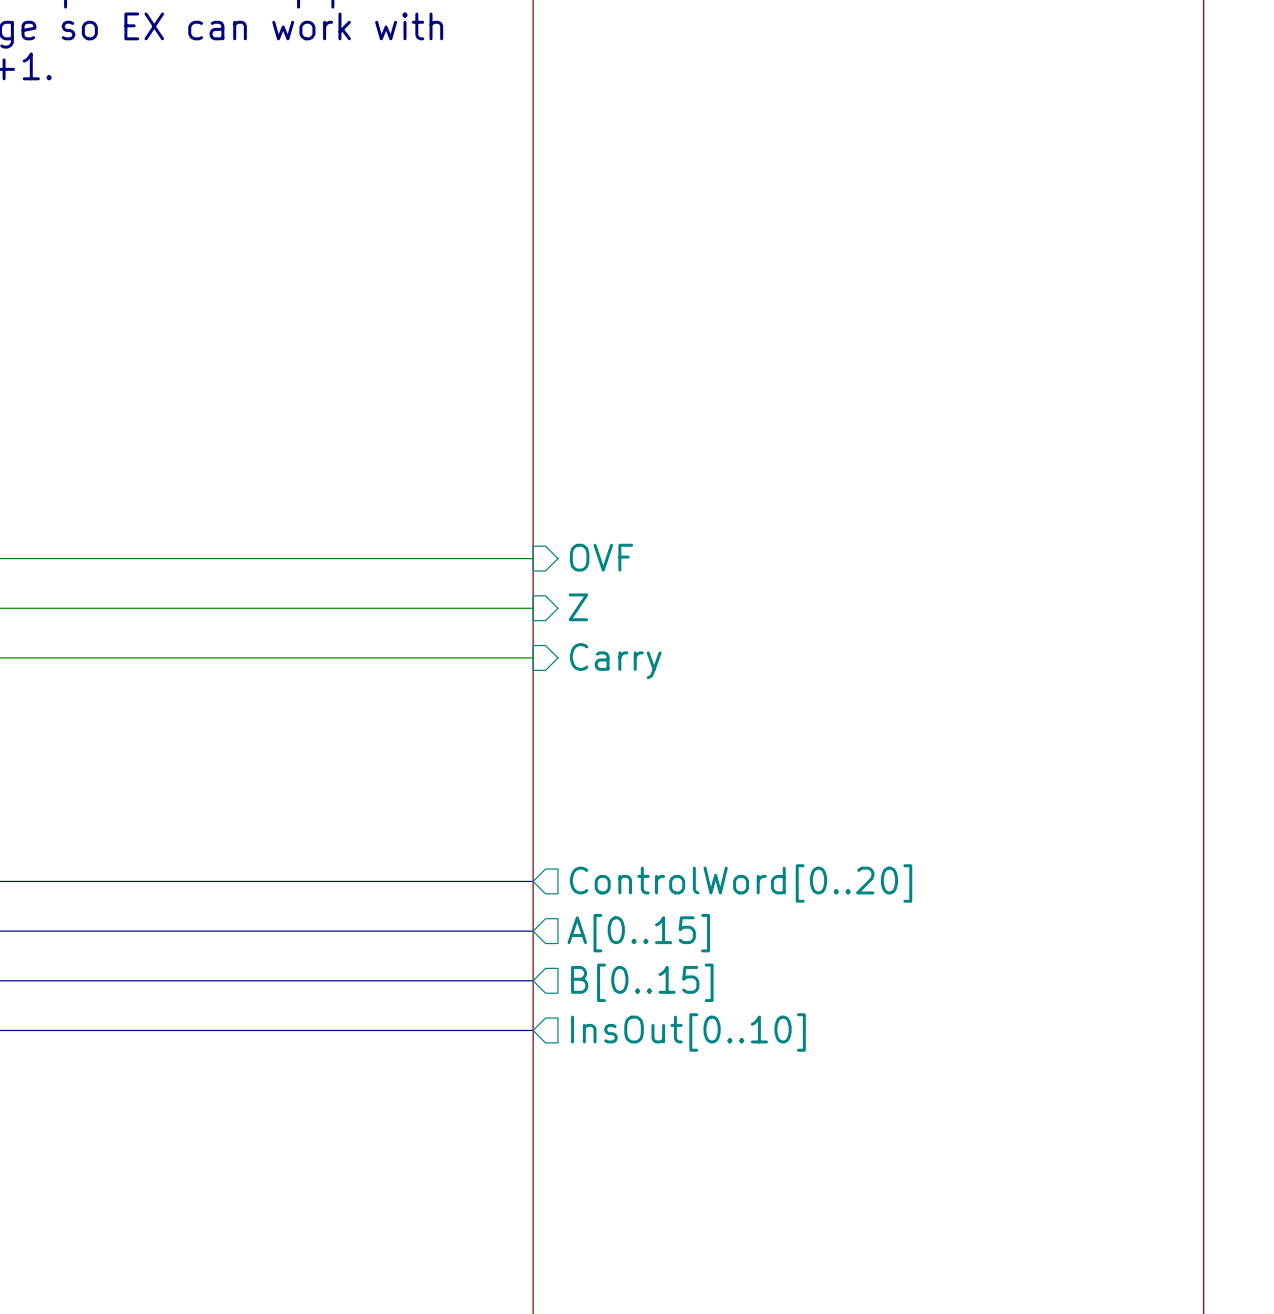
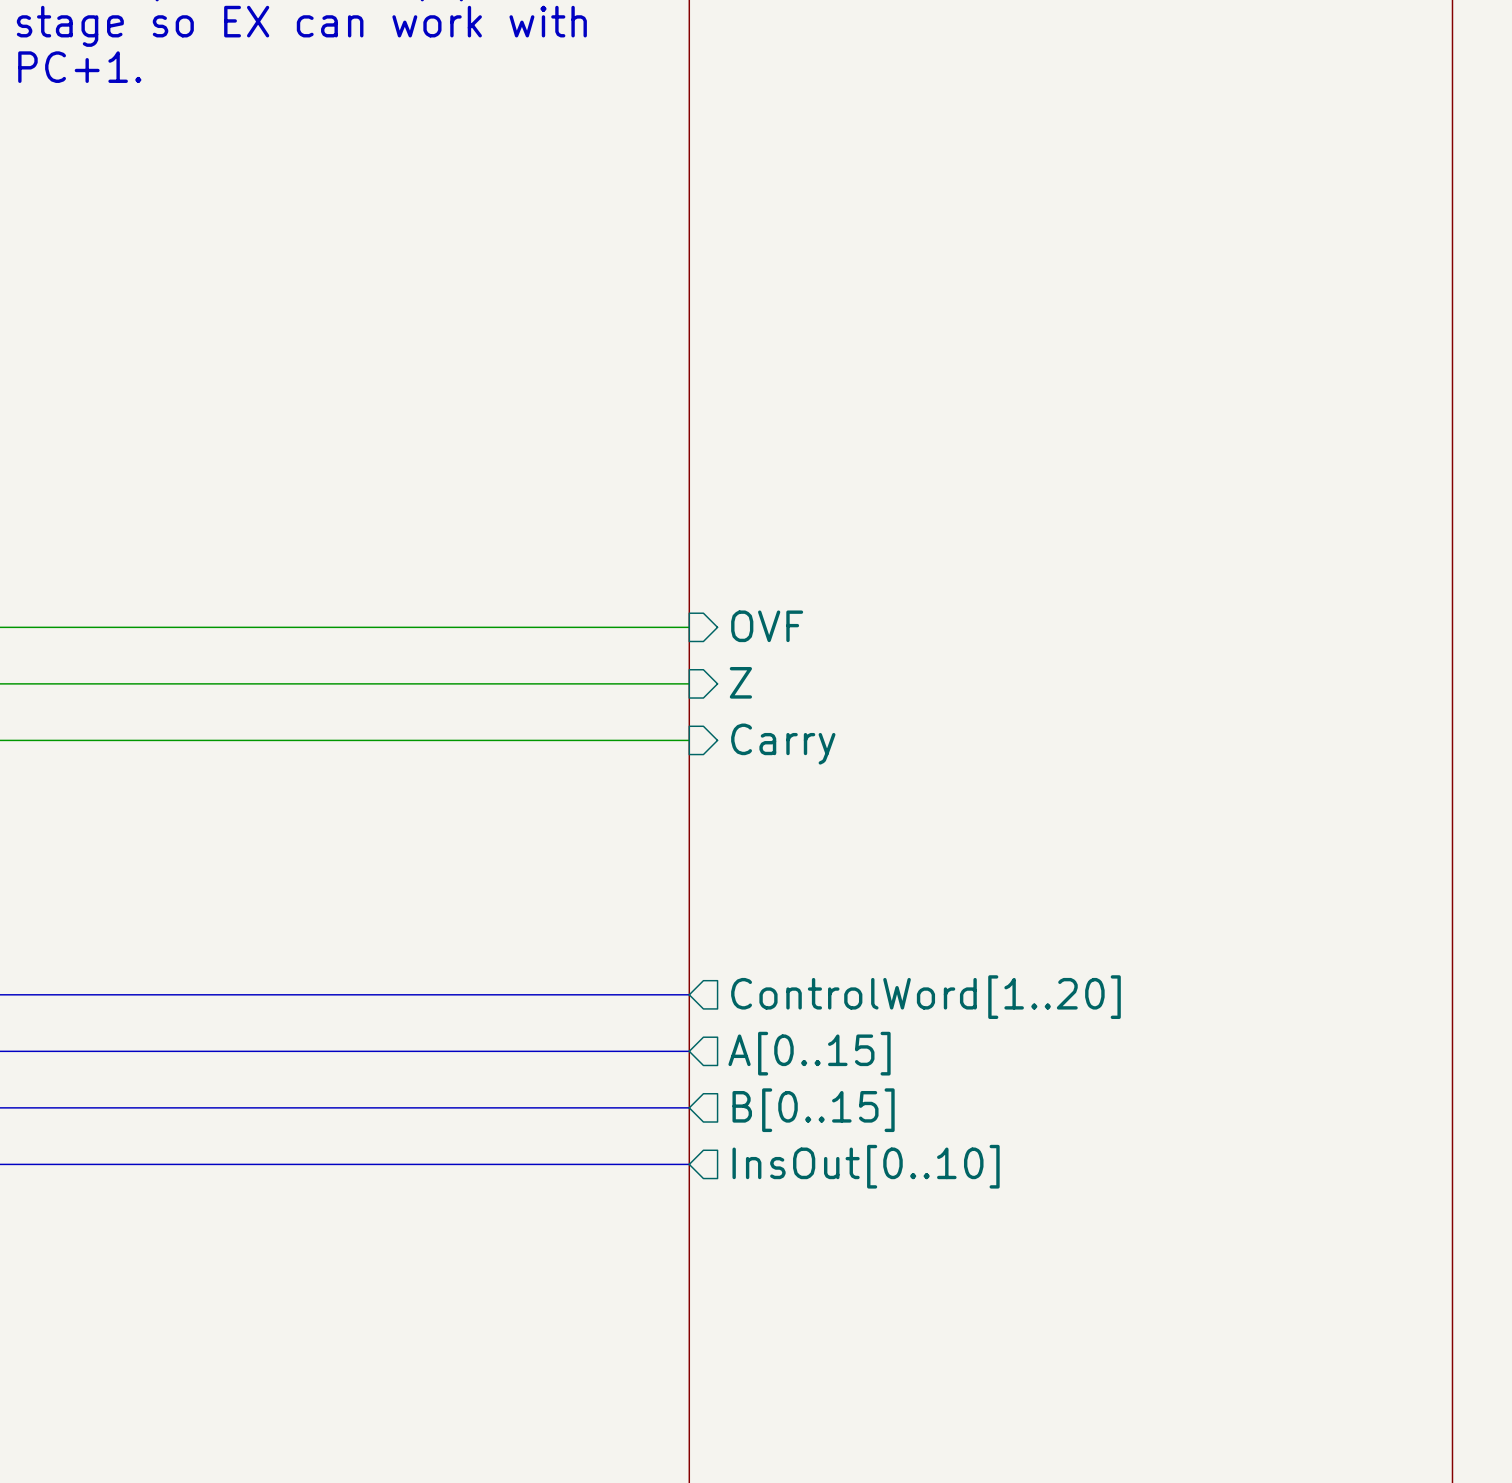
sheet pin: ControlWord[0..20] (741, 883) -> ControlWord[1..20] (925, 997)

